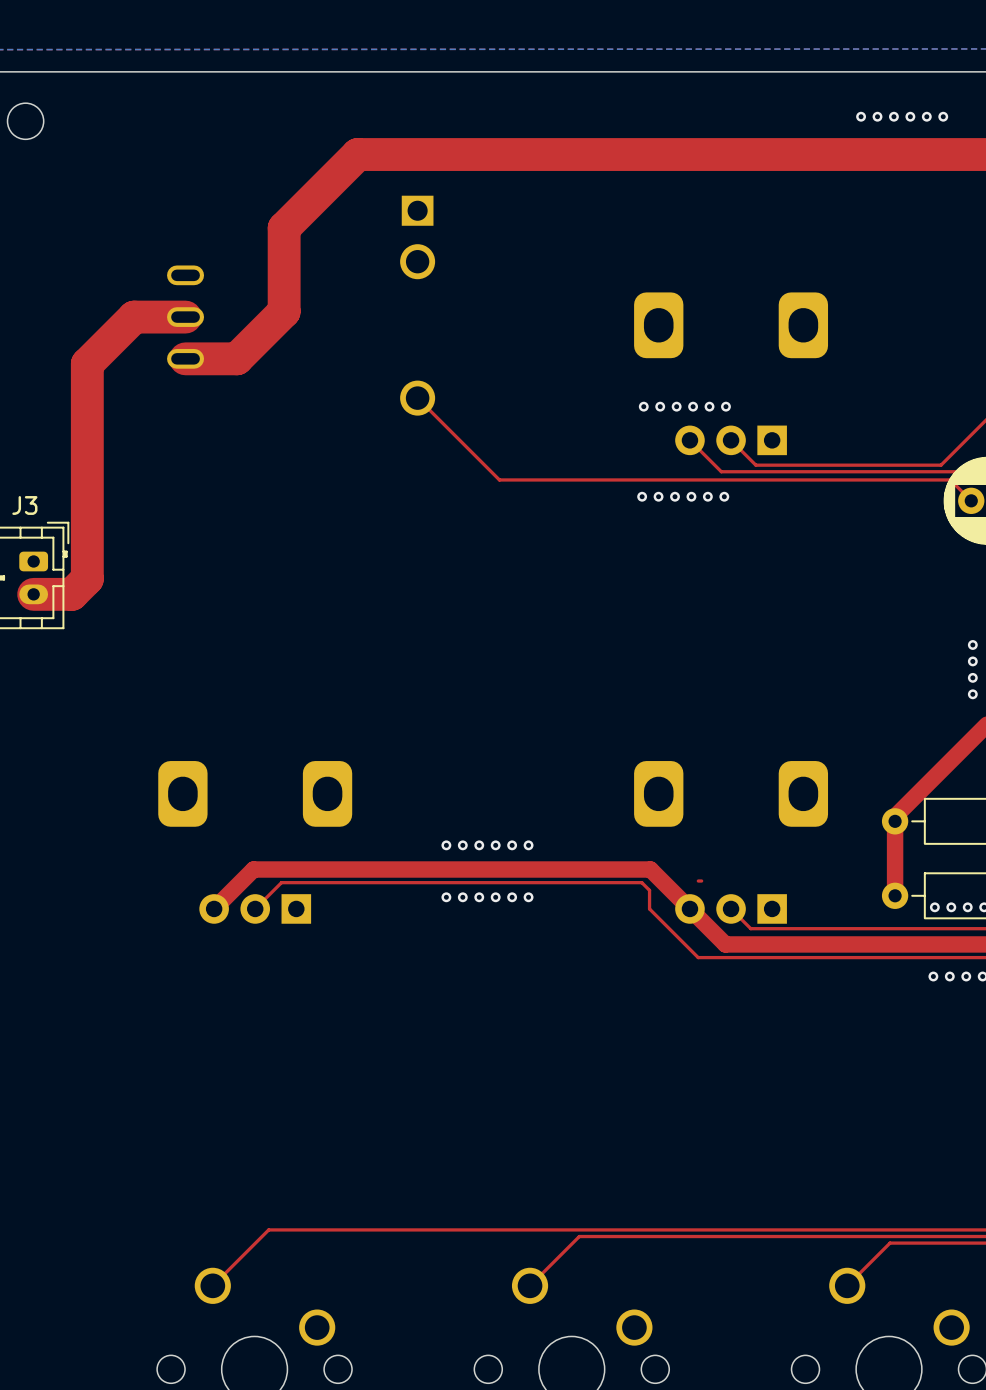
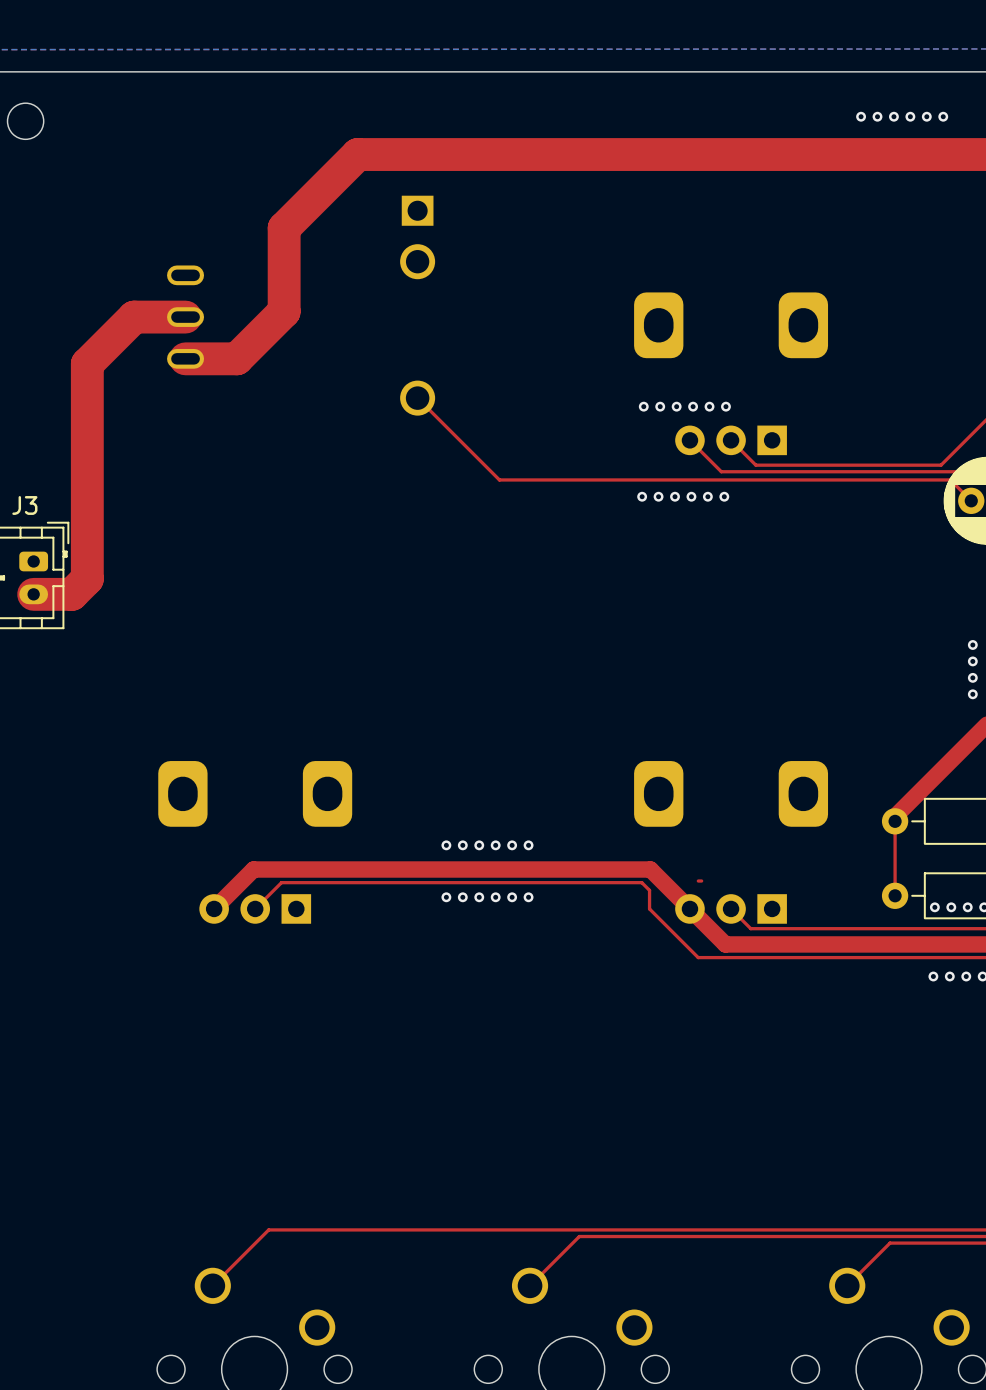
top track width: thick (895, 821) (895, 895) -> thin (895, 821) (895, 895)

